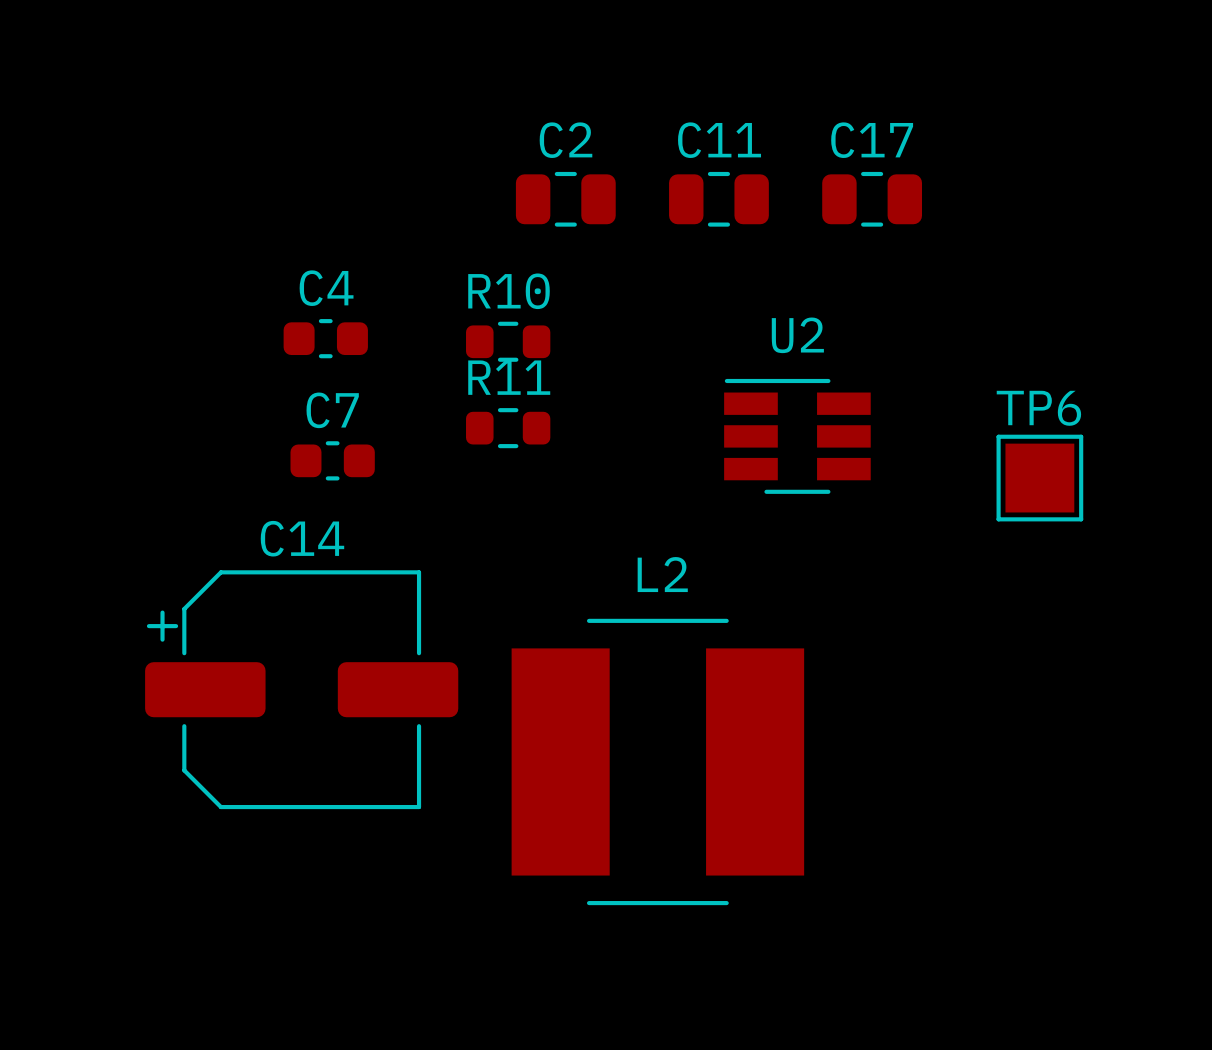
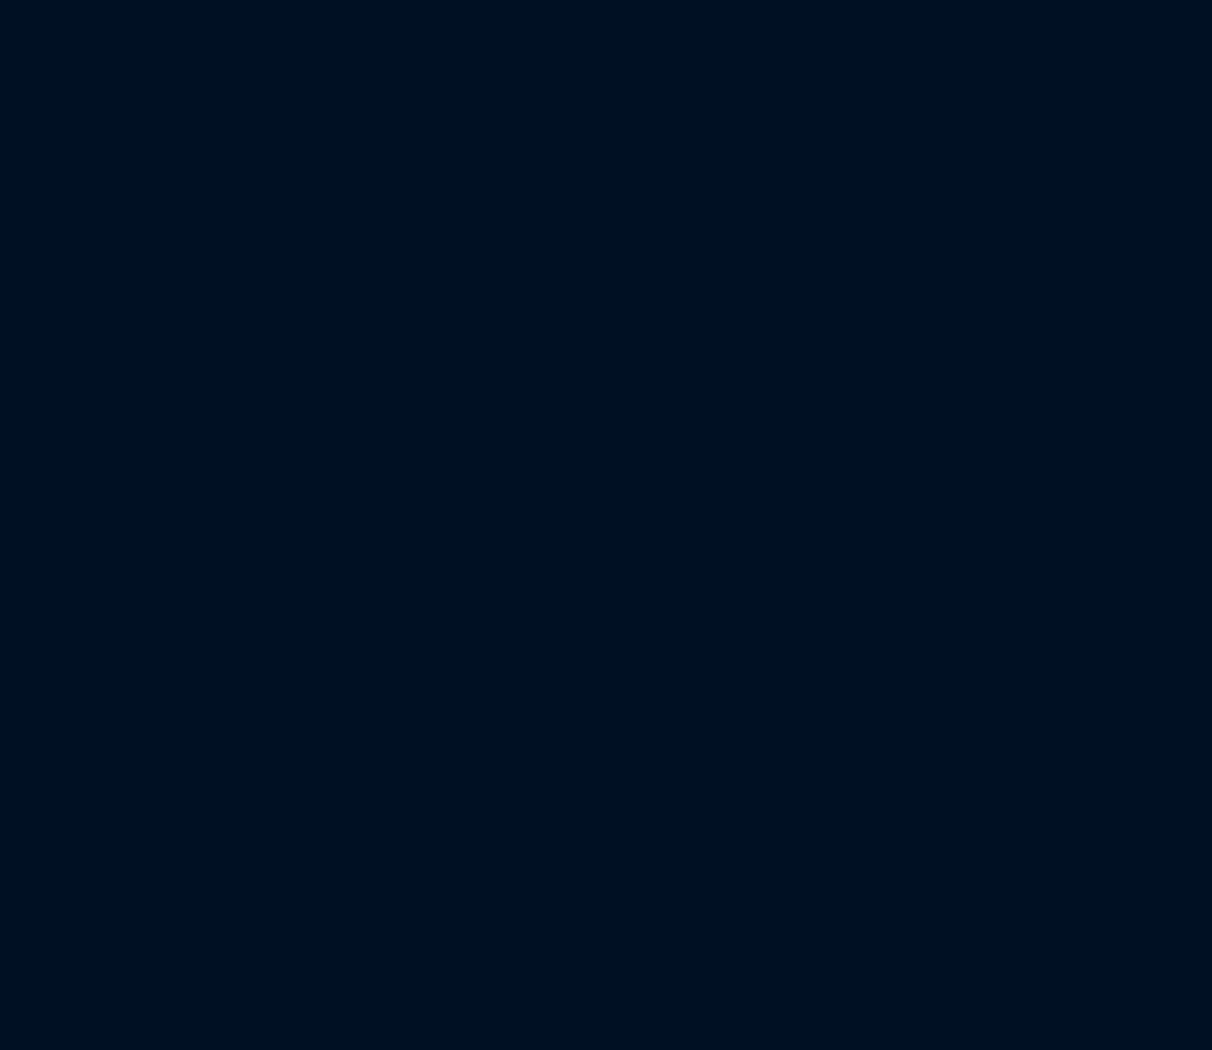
C2: (565, 199) -> none
C11: (718, 199) -> none
C17: (872, 199) -> none
C4: (325, 338) -> none
R10: (508, 341) -> none
R11: (508, 428) -> none
U2: (797, 436) -> none
C7: (332, 460) -> none
TP6: (1039, 478) -> none
C14: (301, 689) -> none
L2: (657, 761) -> none

